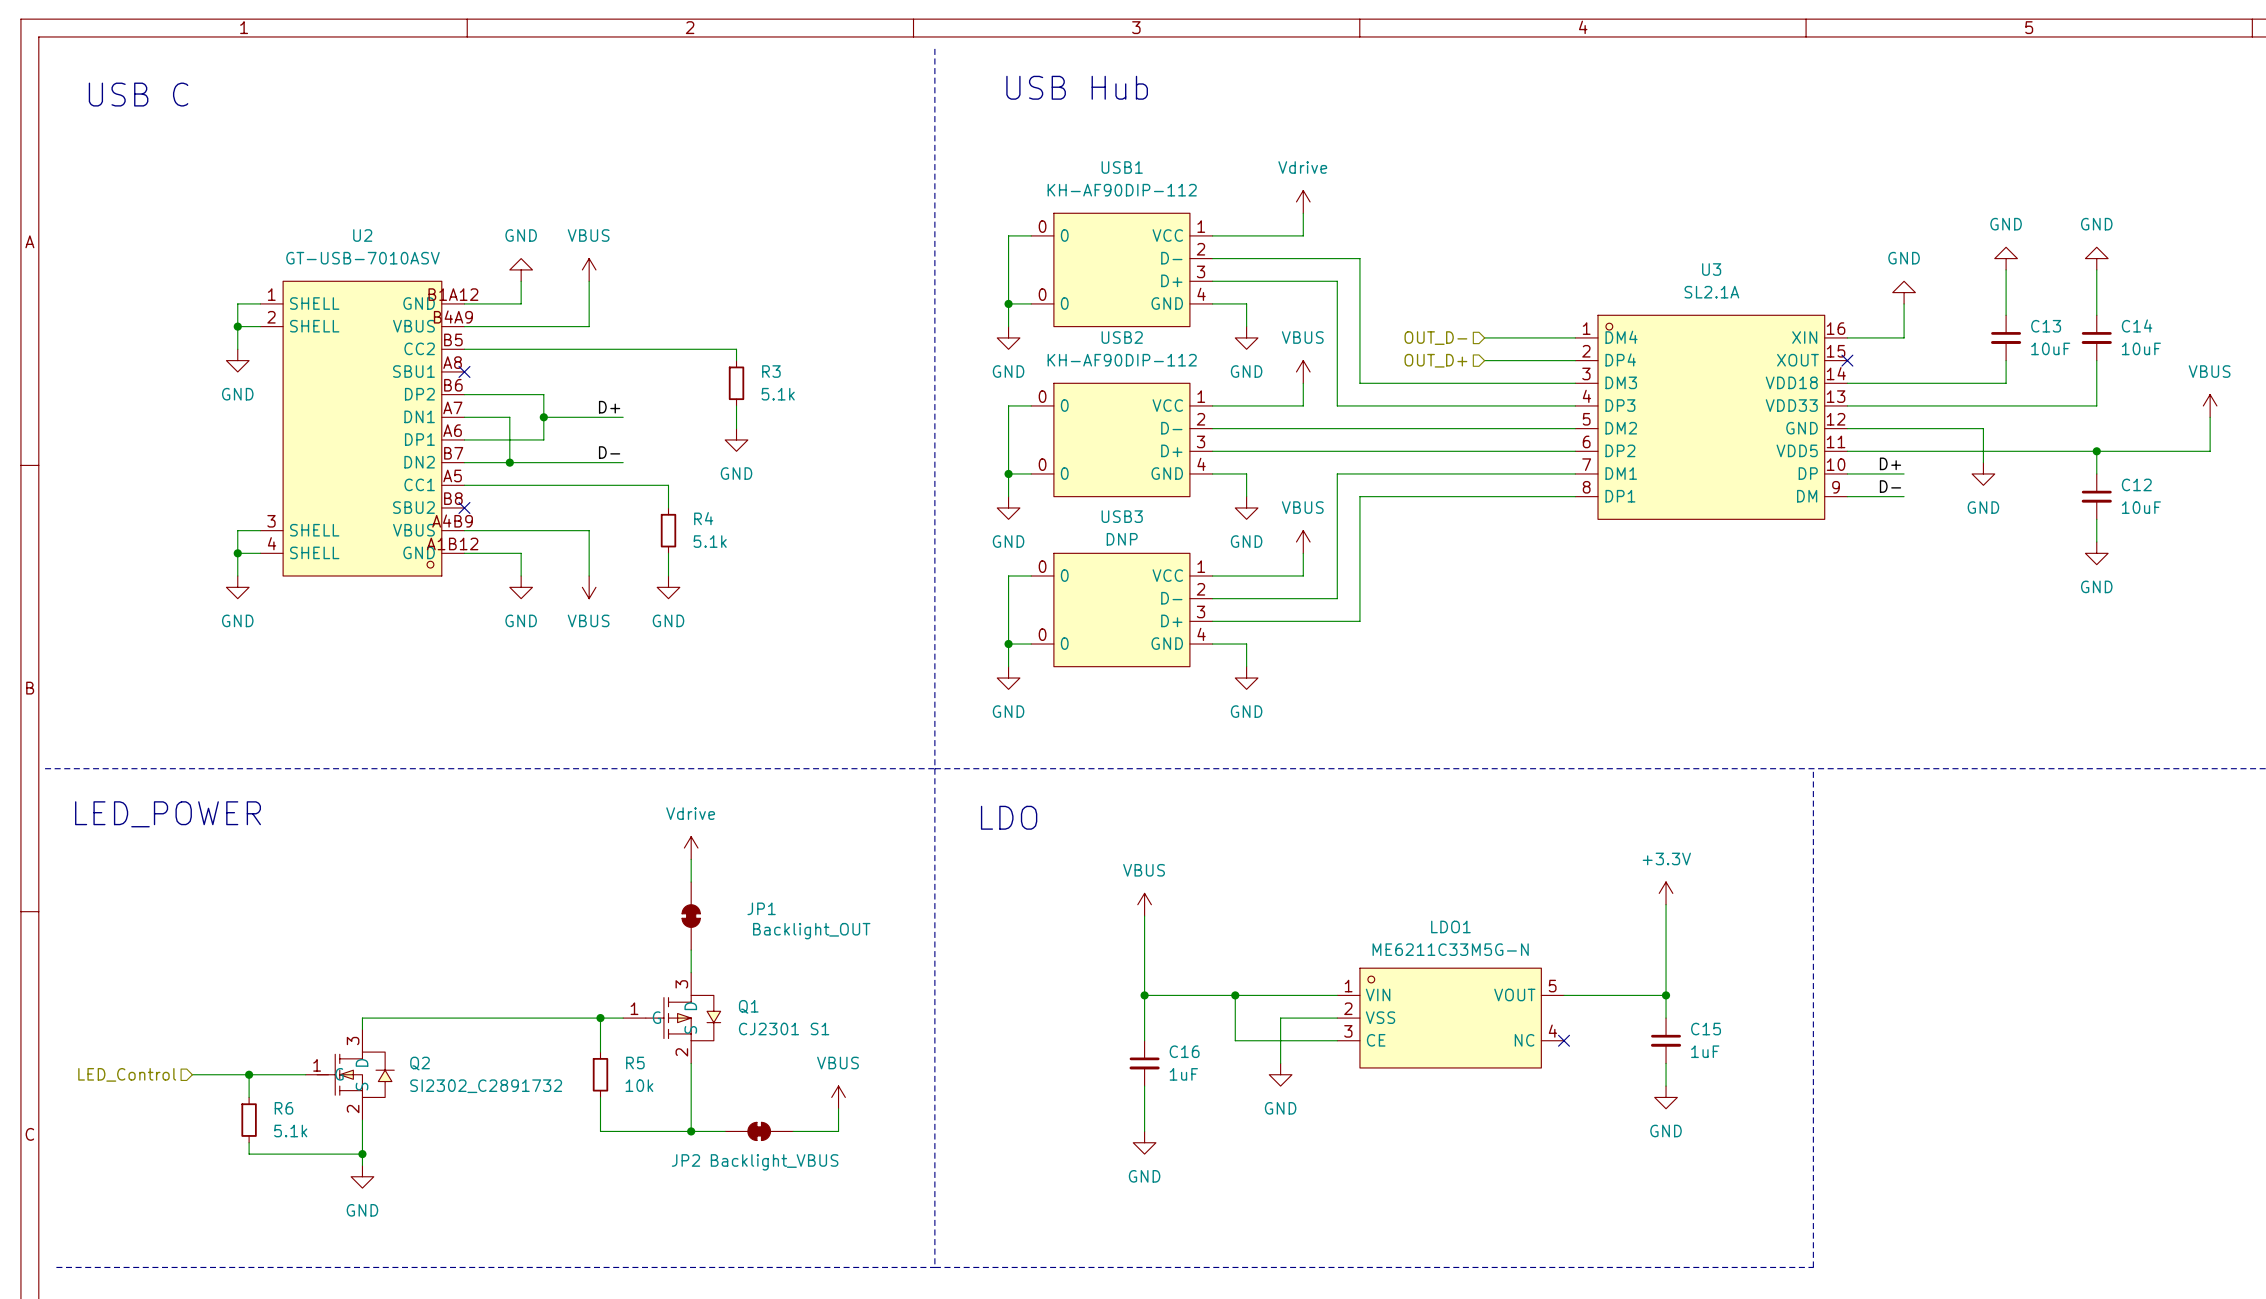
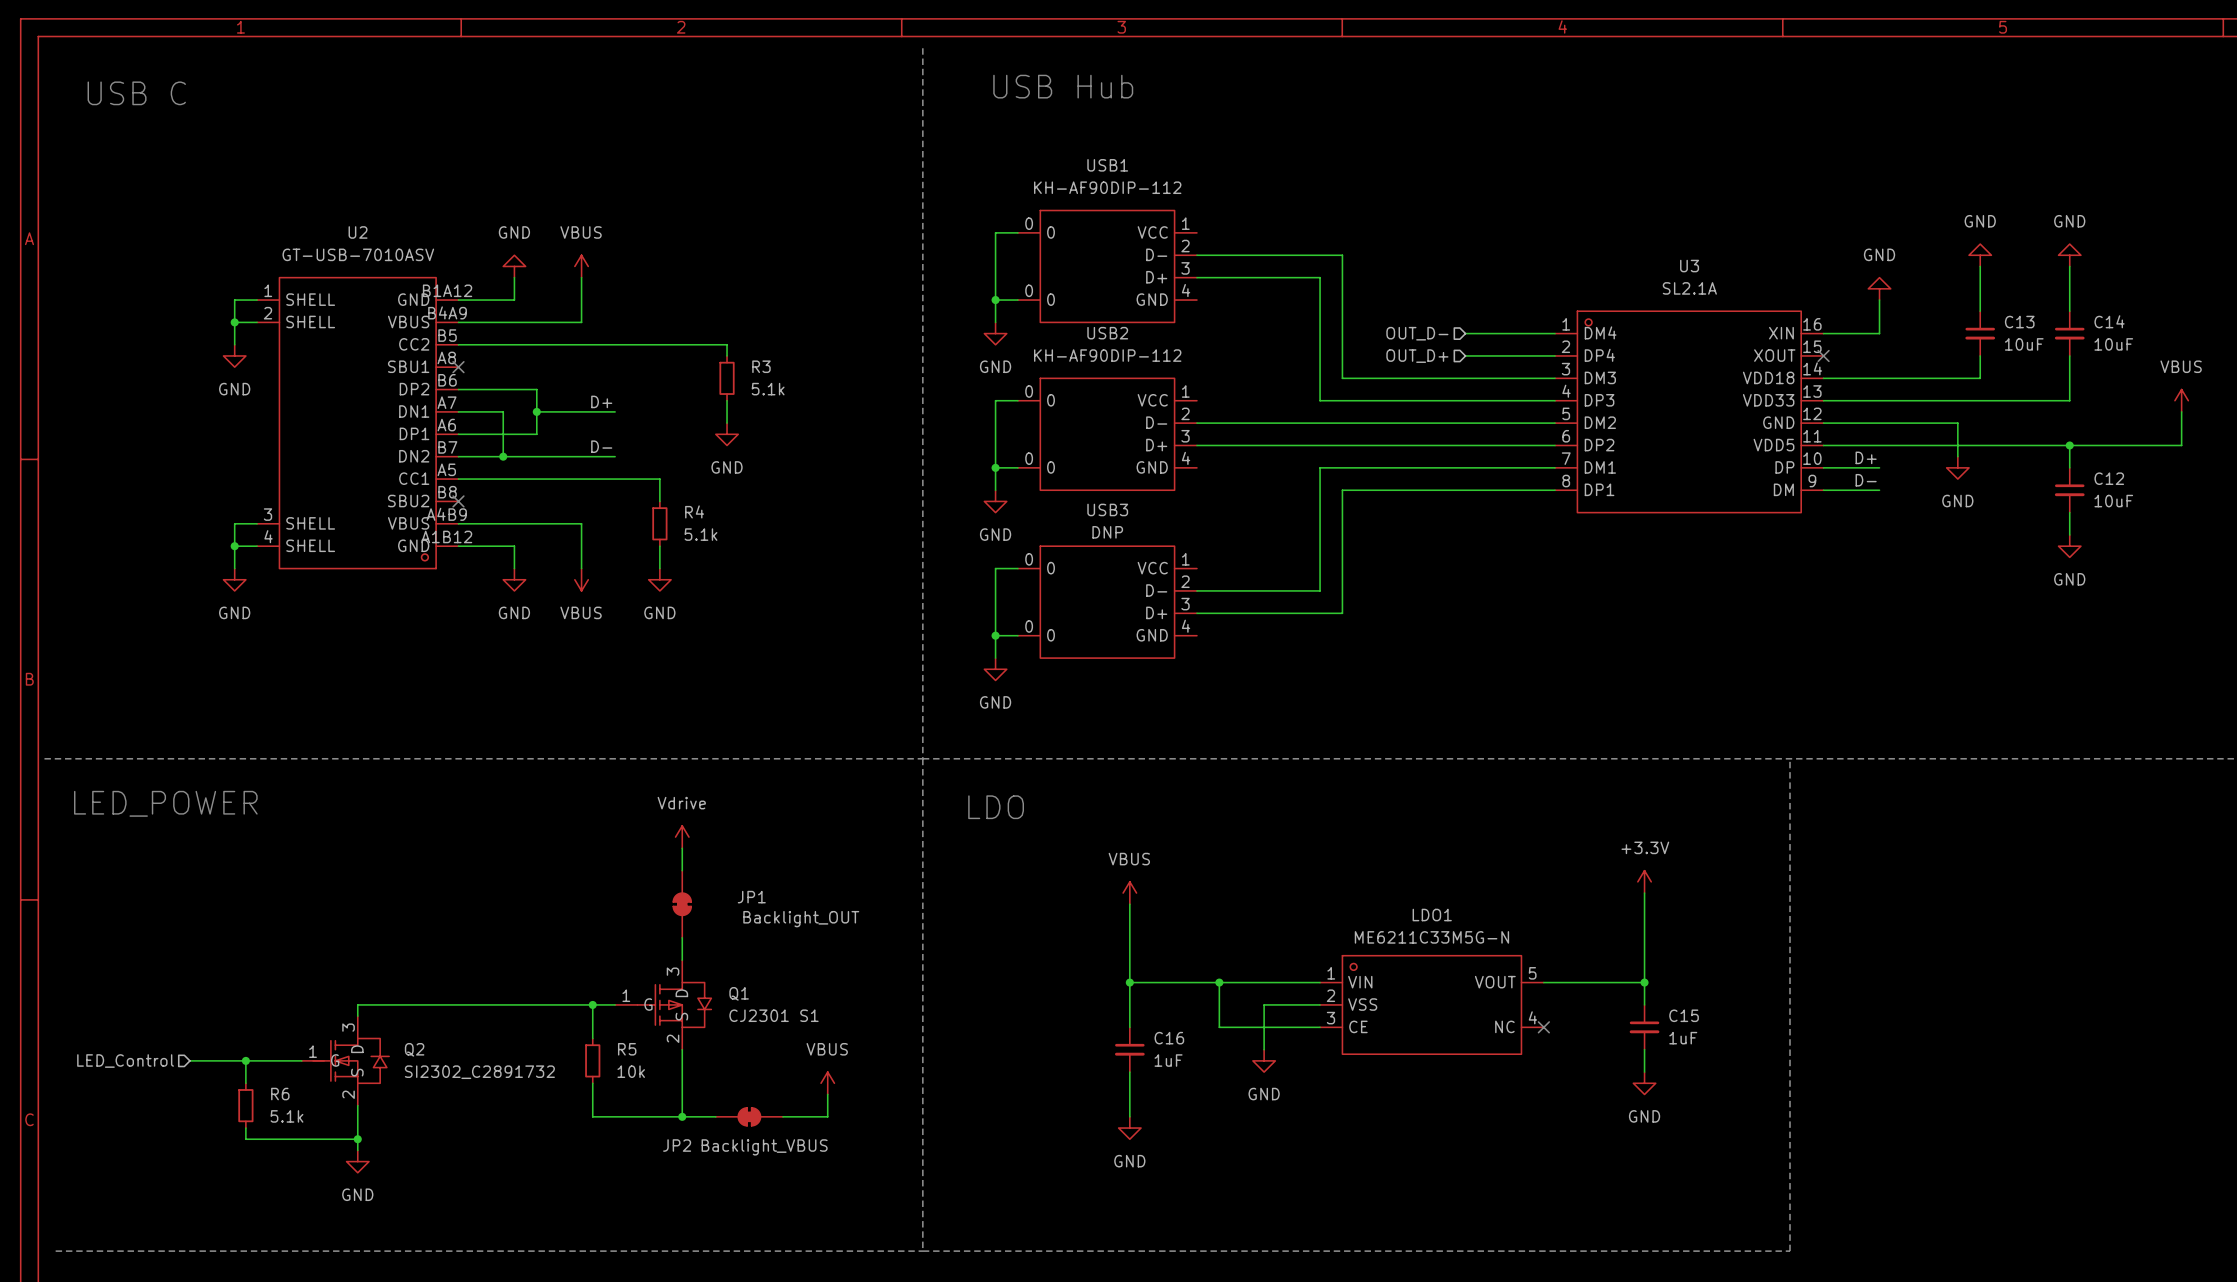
power symbol: Vdrive (1303, 201) -> none
wire: (1303, 213) (1303, 235) (1212, 235) -> none
wire: (1212, 303) (1246, 303) (1246, 326) -> none
power symbol: GND (1246, 337) -> none
power symbol: VBUS (1303, 371) -> none
wire: (1303, 383) (1303, 405) (1212, 405) -> none
wire: (1212, 473) (1246, 473) (1246, 496) -> none
power symbol: GND (1246, 507) -> none
power symbol: VBUS (1303, 541) -> none
wire: (1303, 553) (1303, 575) (1212, 575) -> none
wire: (1212, 644) (1246, 644) (1246, 666) -> none
power symbol: GND (1246, 678) -> none

